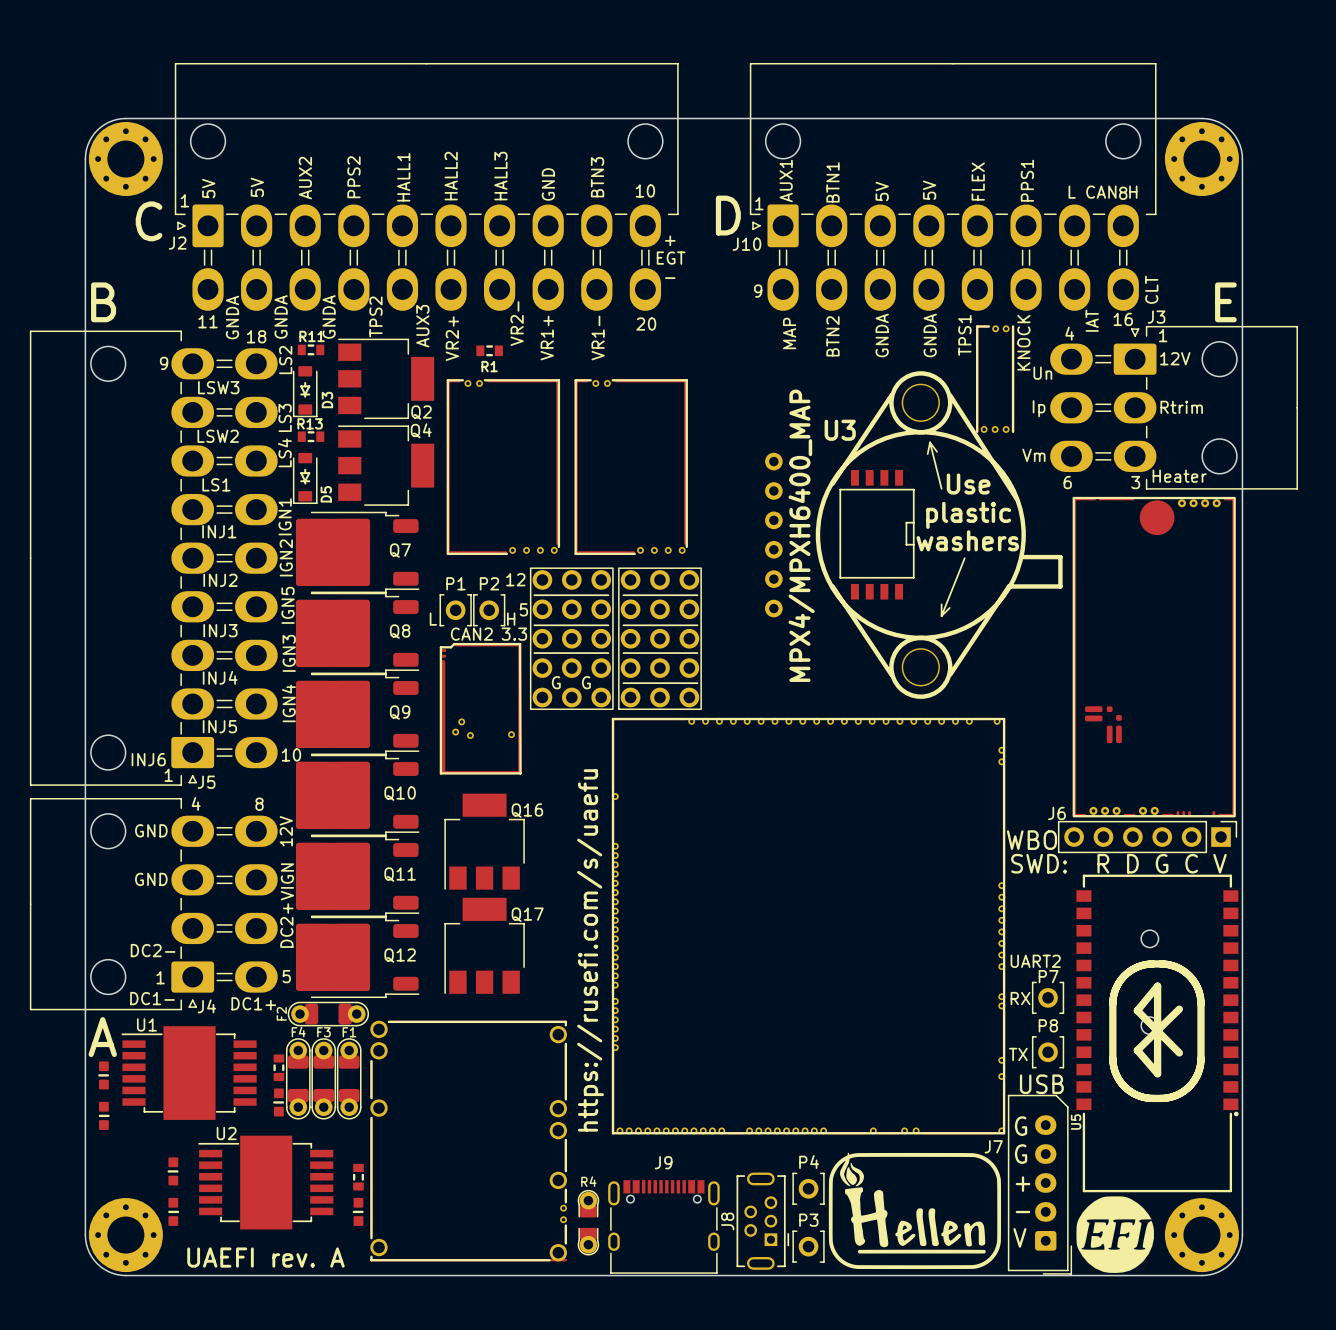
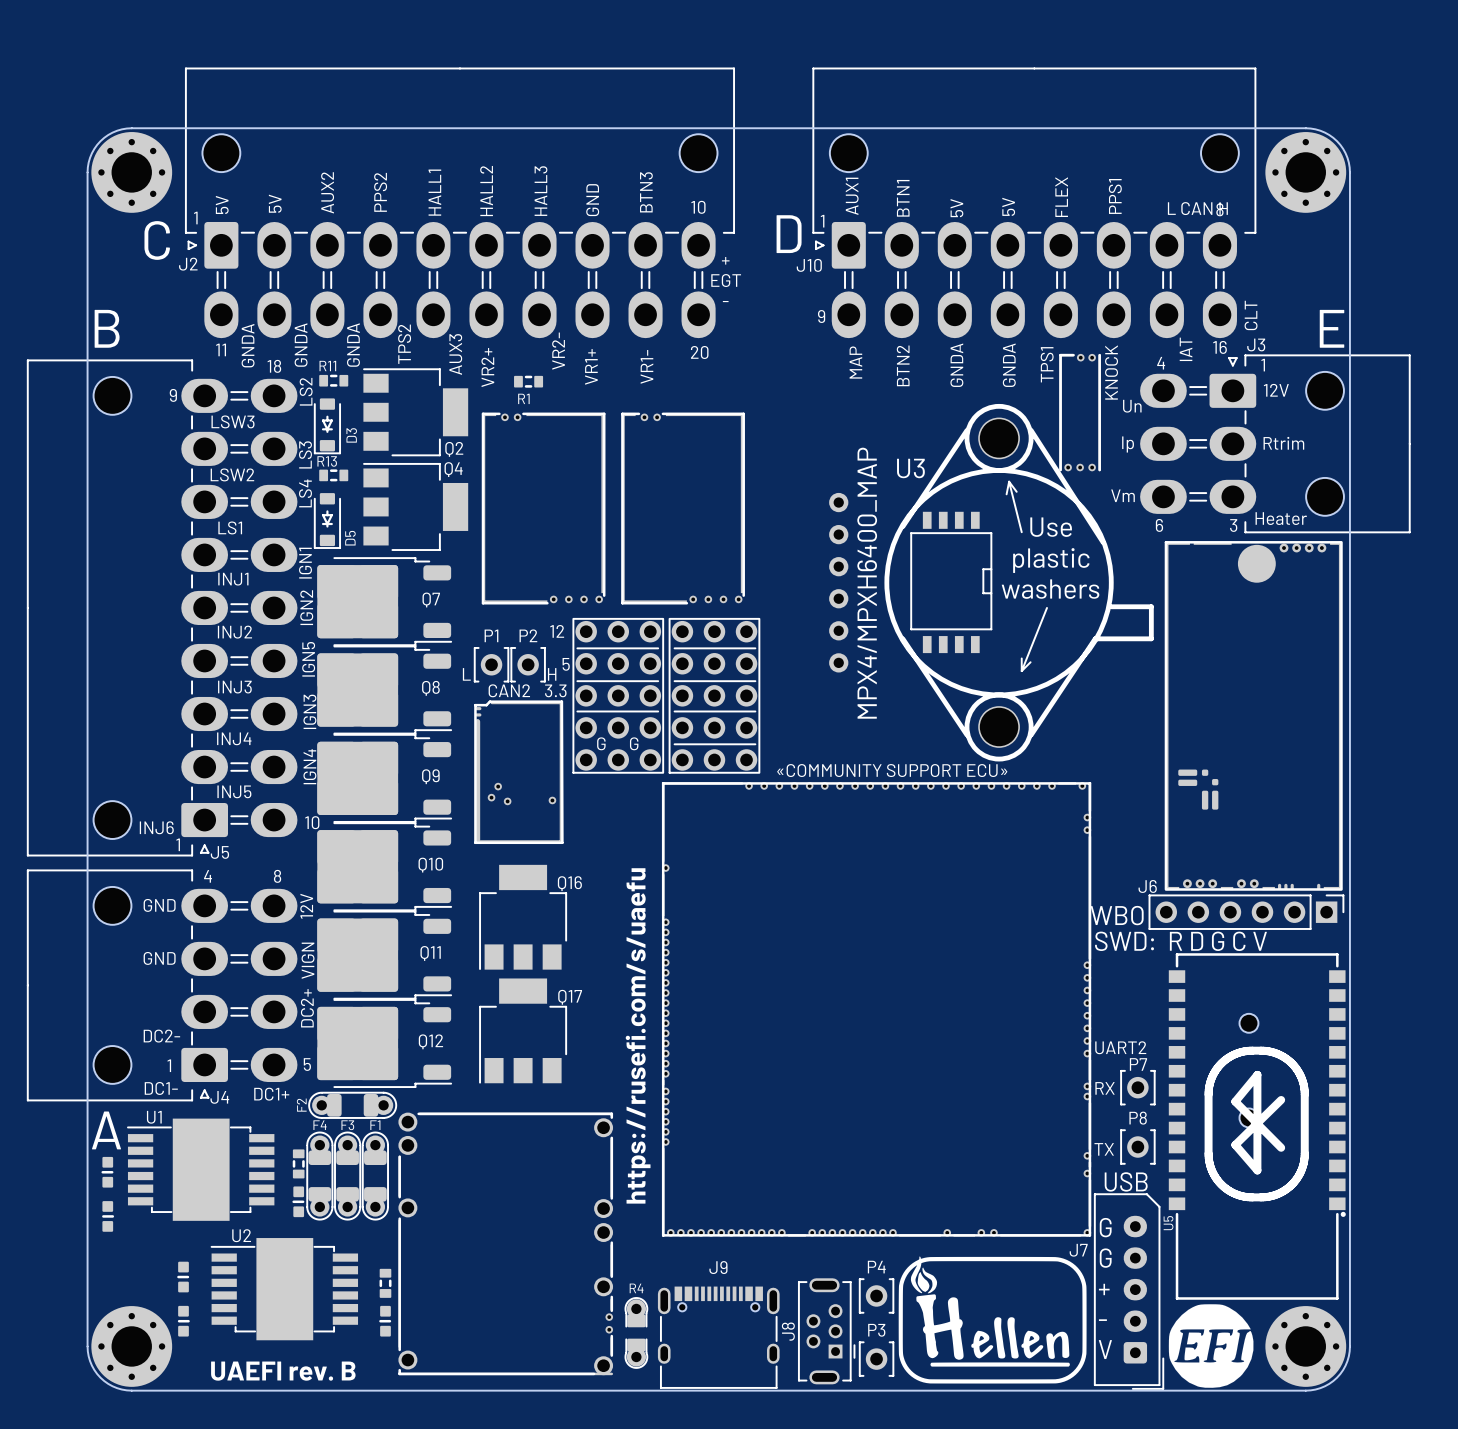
text: none -> «COMMUNITY SUPPORT ECU» (892, 770)
text: UAEFI rev. A (265, 1257) -> UAEFI rev. B (283, 1371)

